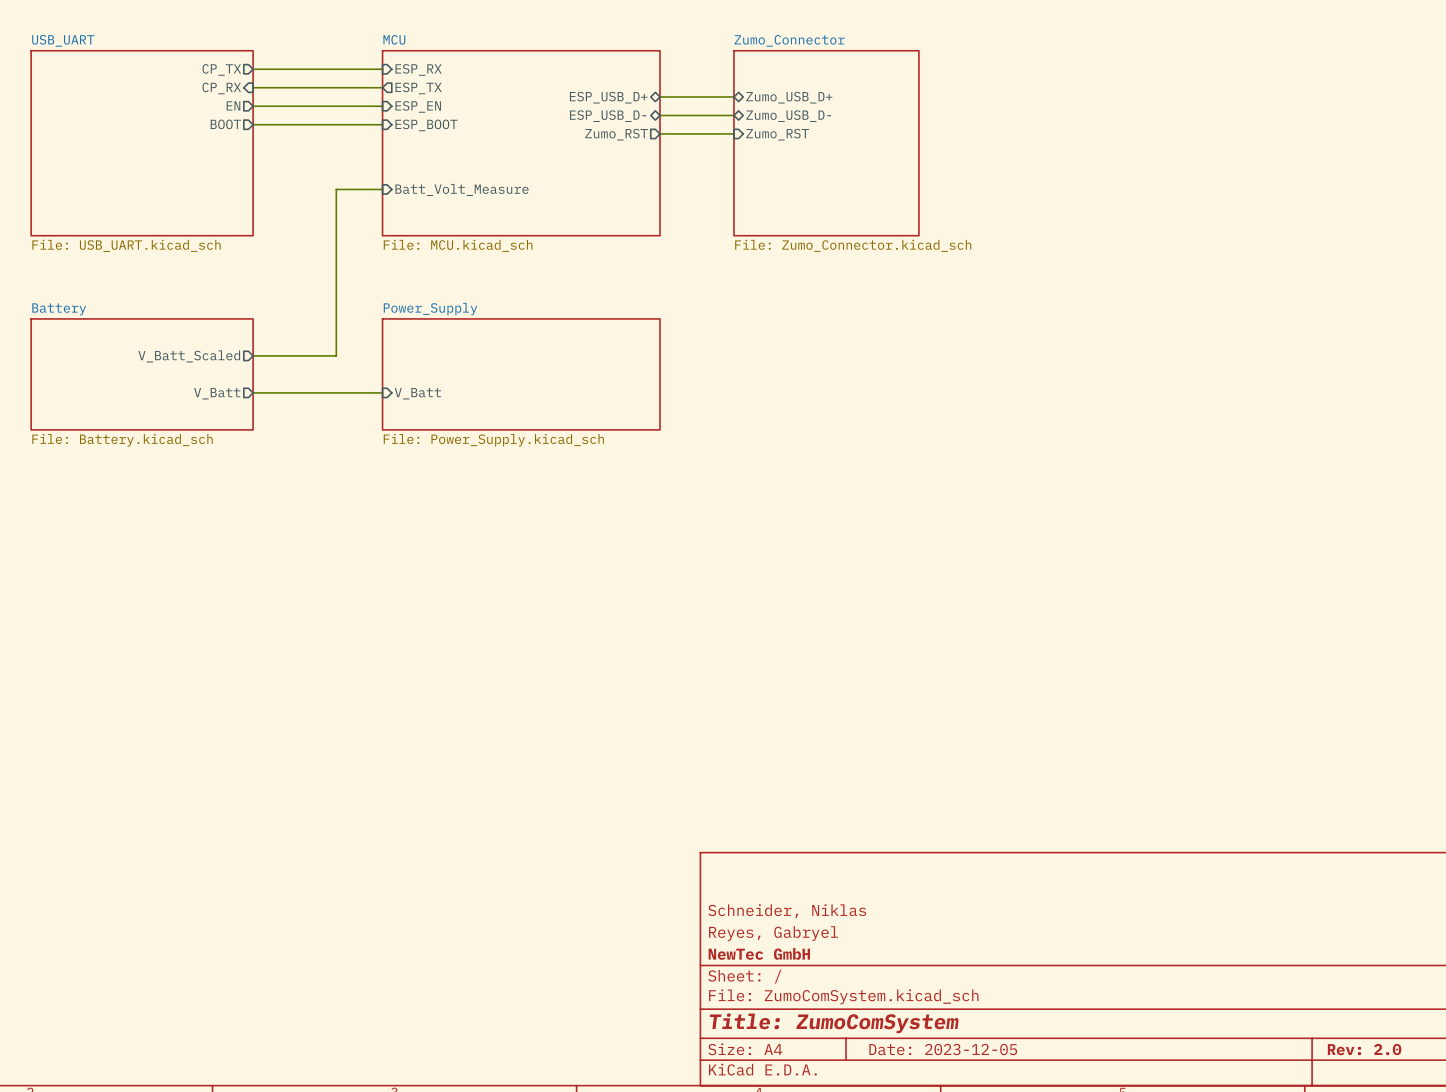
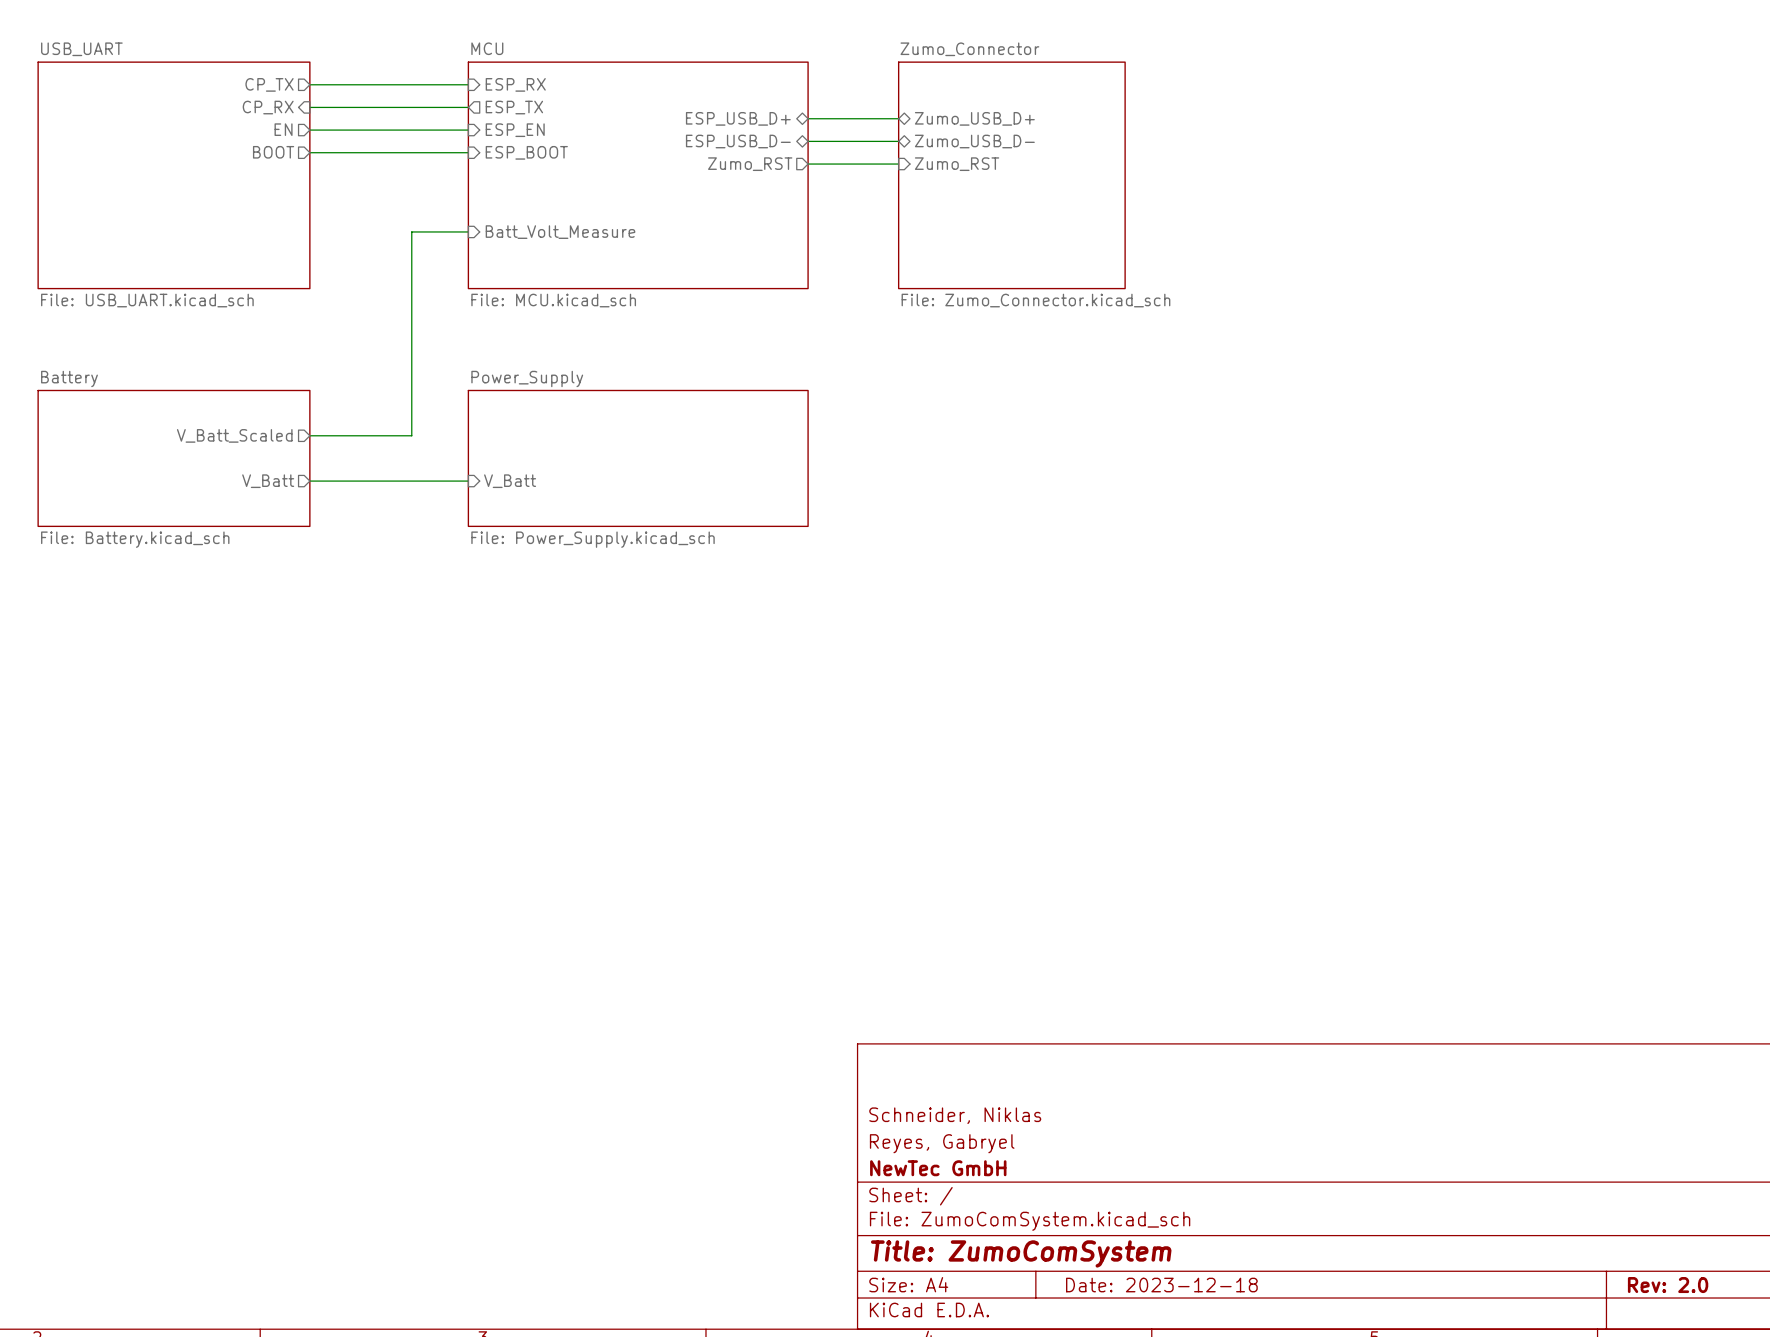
title block: Date: 2023-12-05 (943, 1049) -> Date: 2023-12-18 (1161, 1285)

